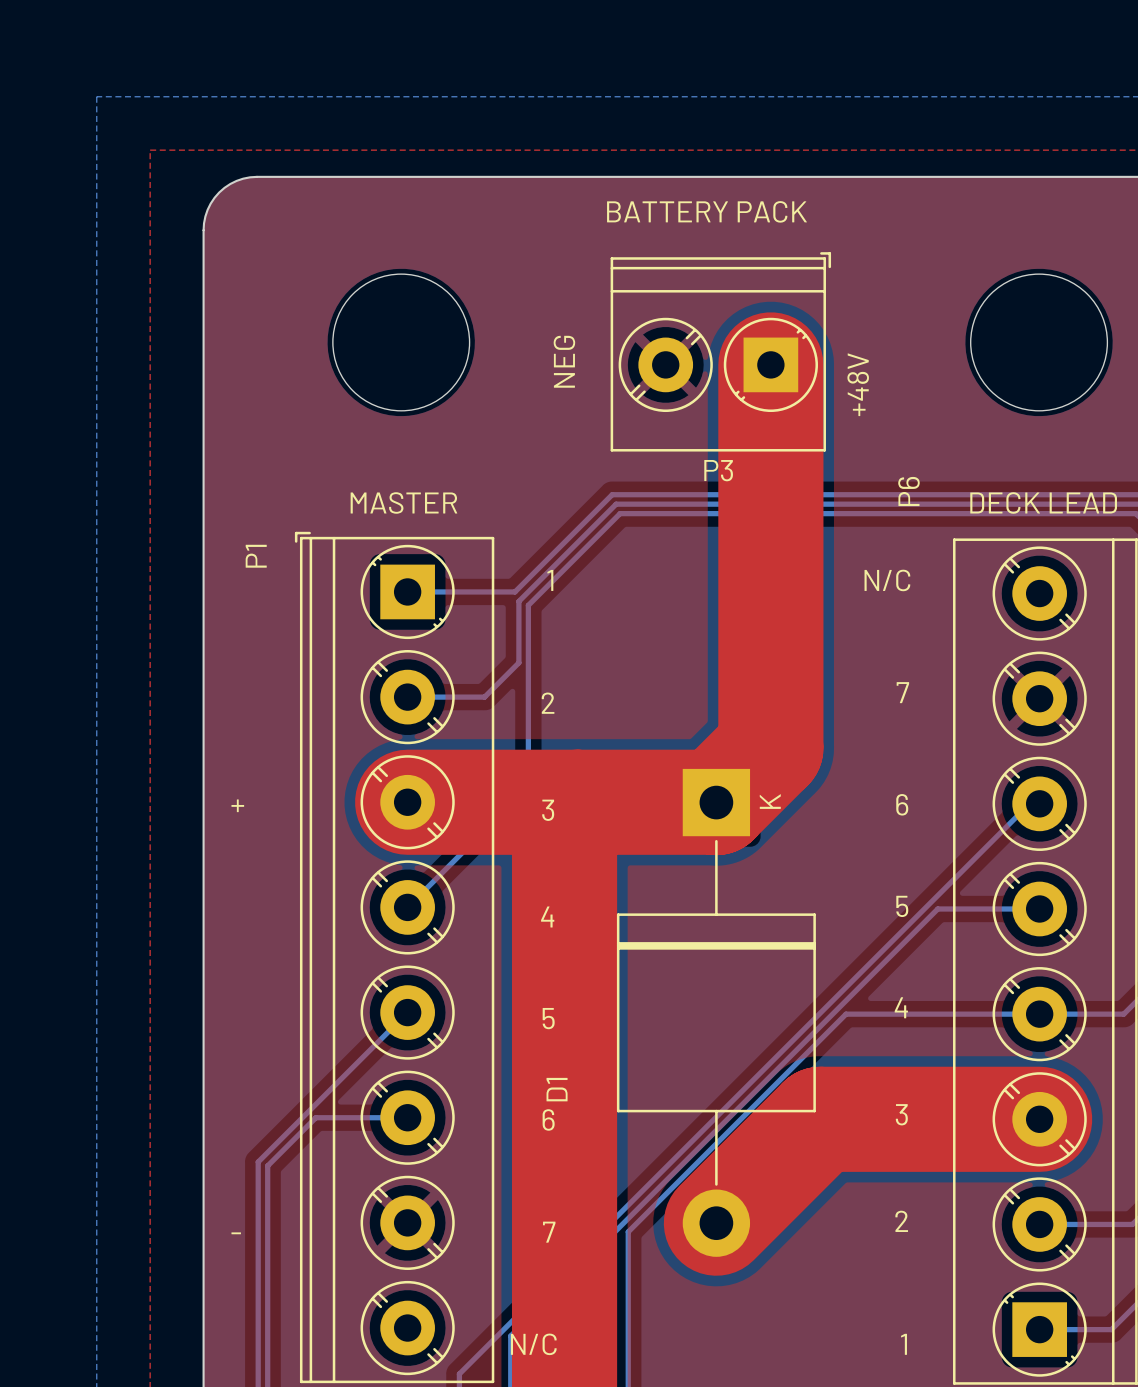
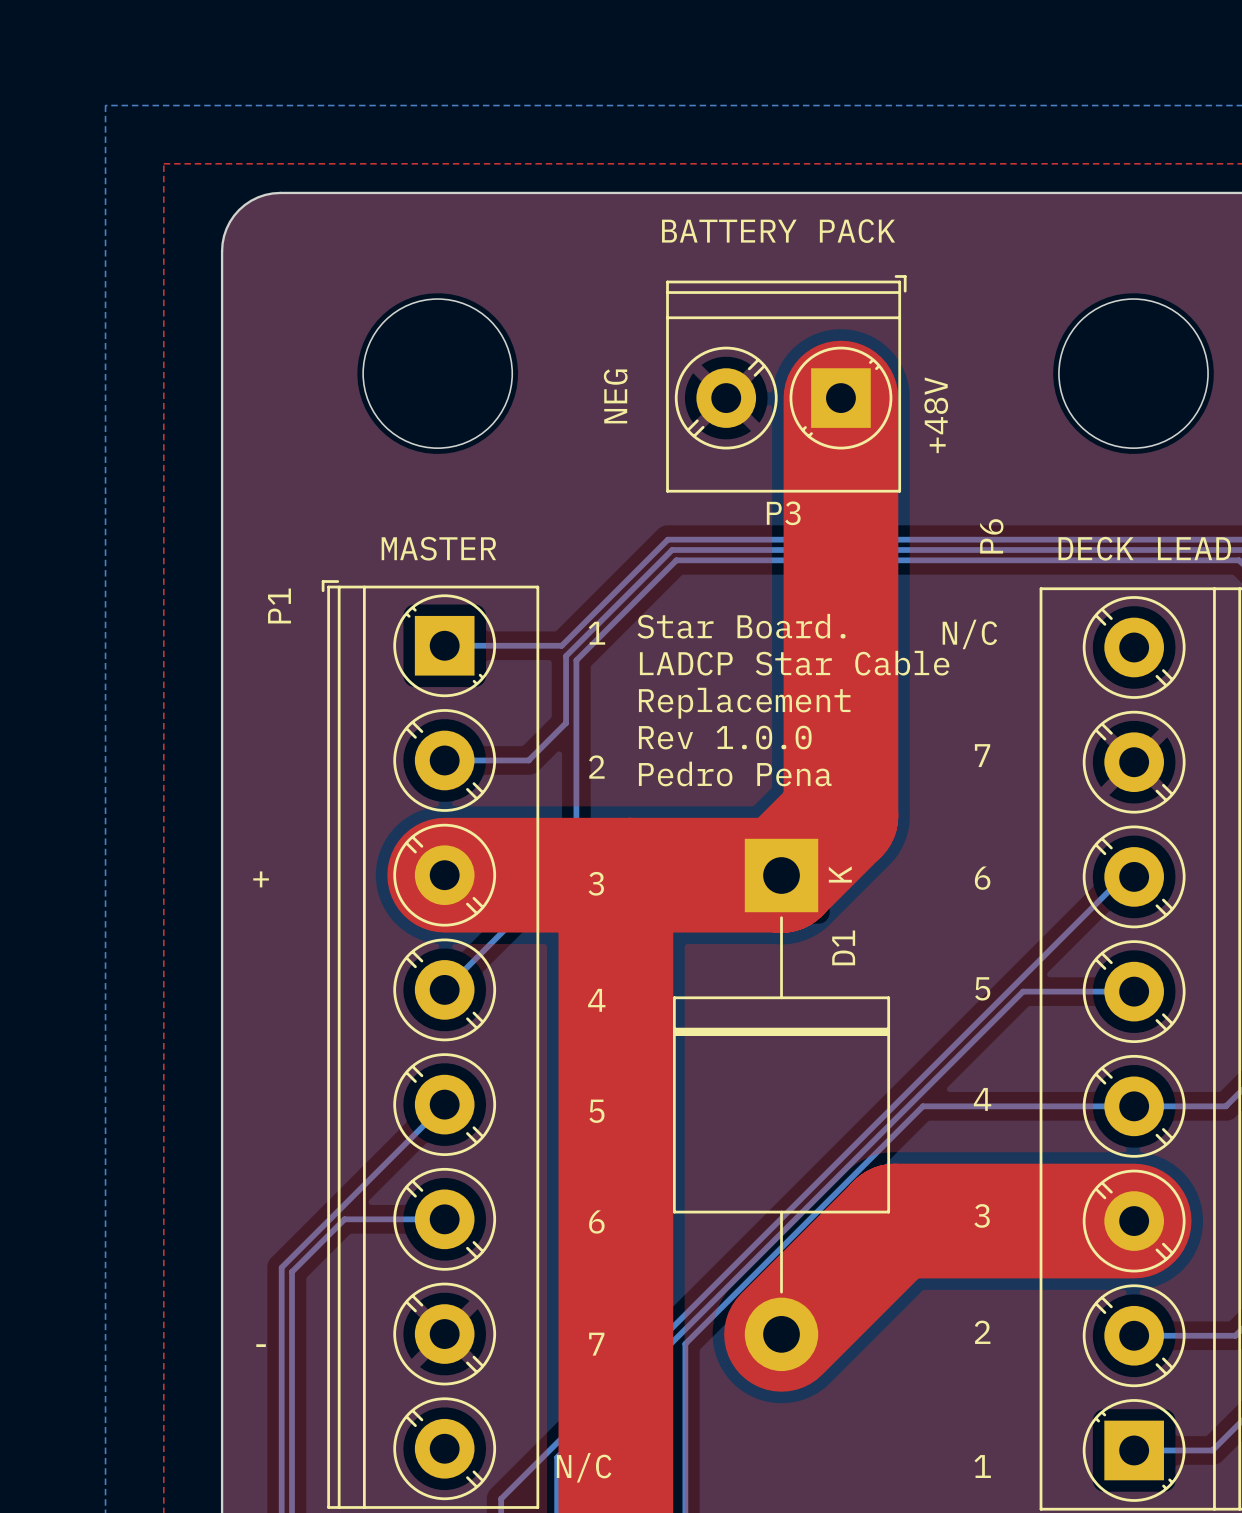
text: none -> Star Board. (741, 626)
text: none -> LADCP Star Cable (794, 663)
text: none -> Replacement (744, 703)
text: none -> Rev 1.0.0 (725, 737)
text: none -> Pedro Pena (735, 773)
D1 name position: D1 (557, 1089) -> D1 (843, 947)

